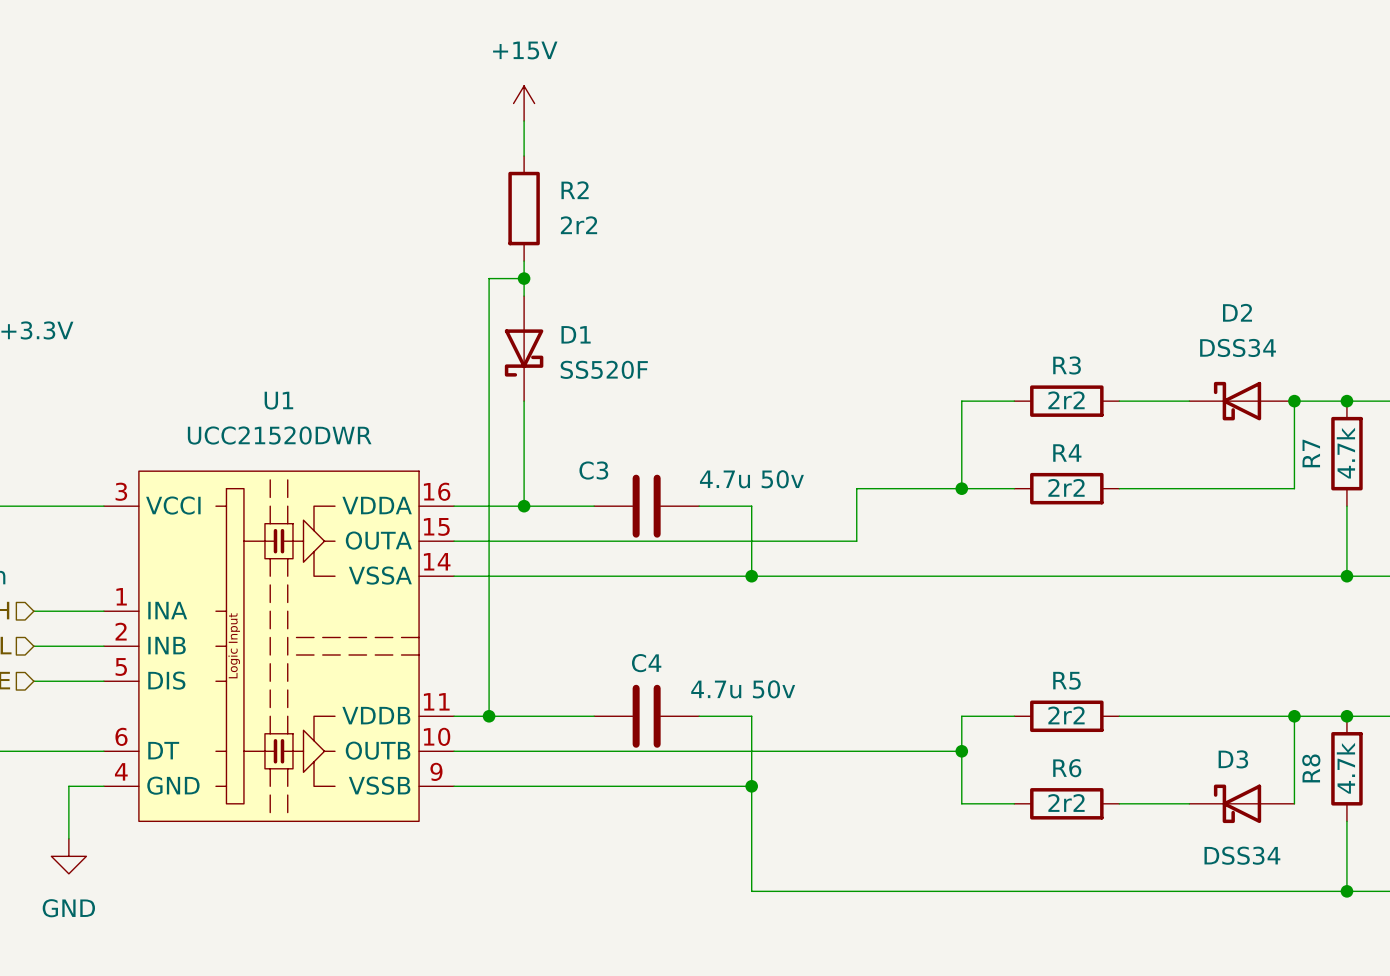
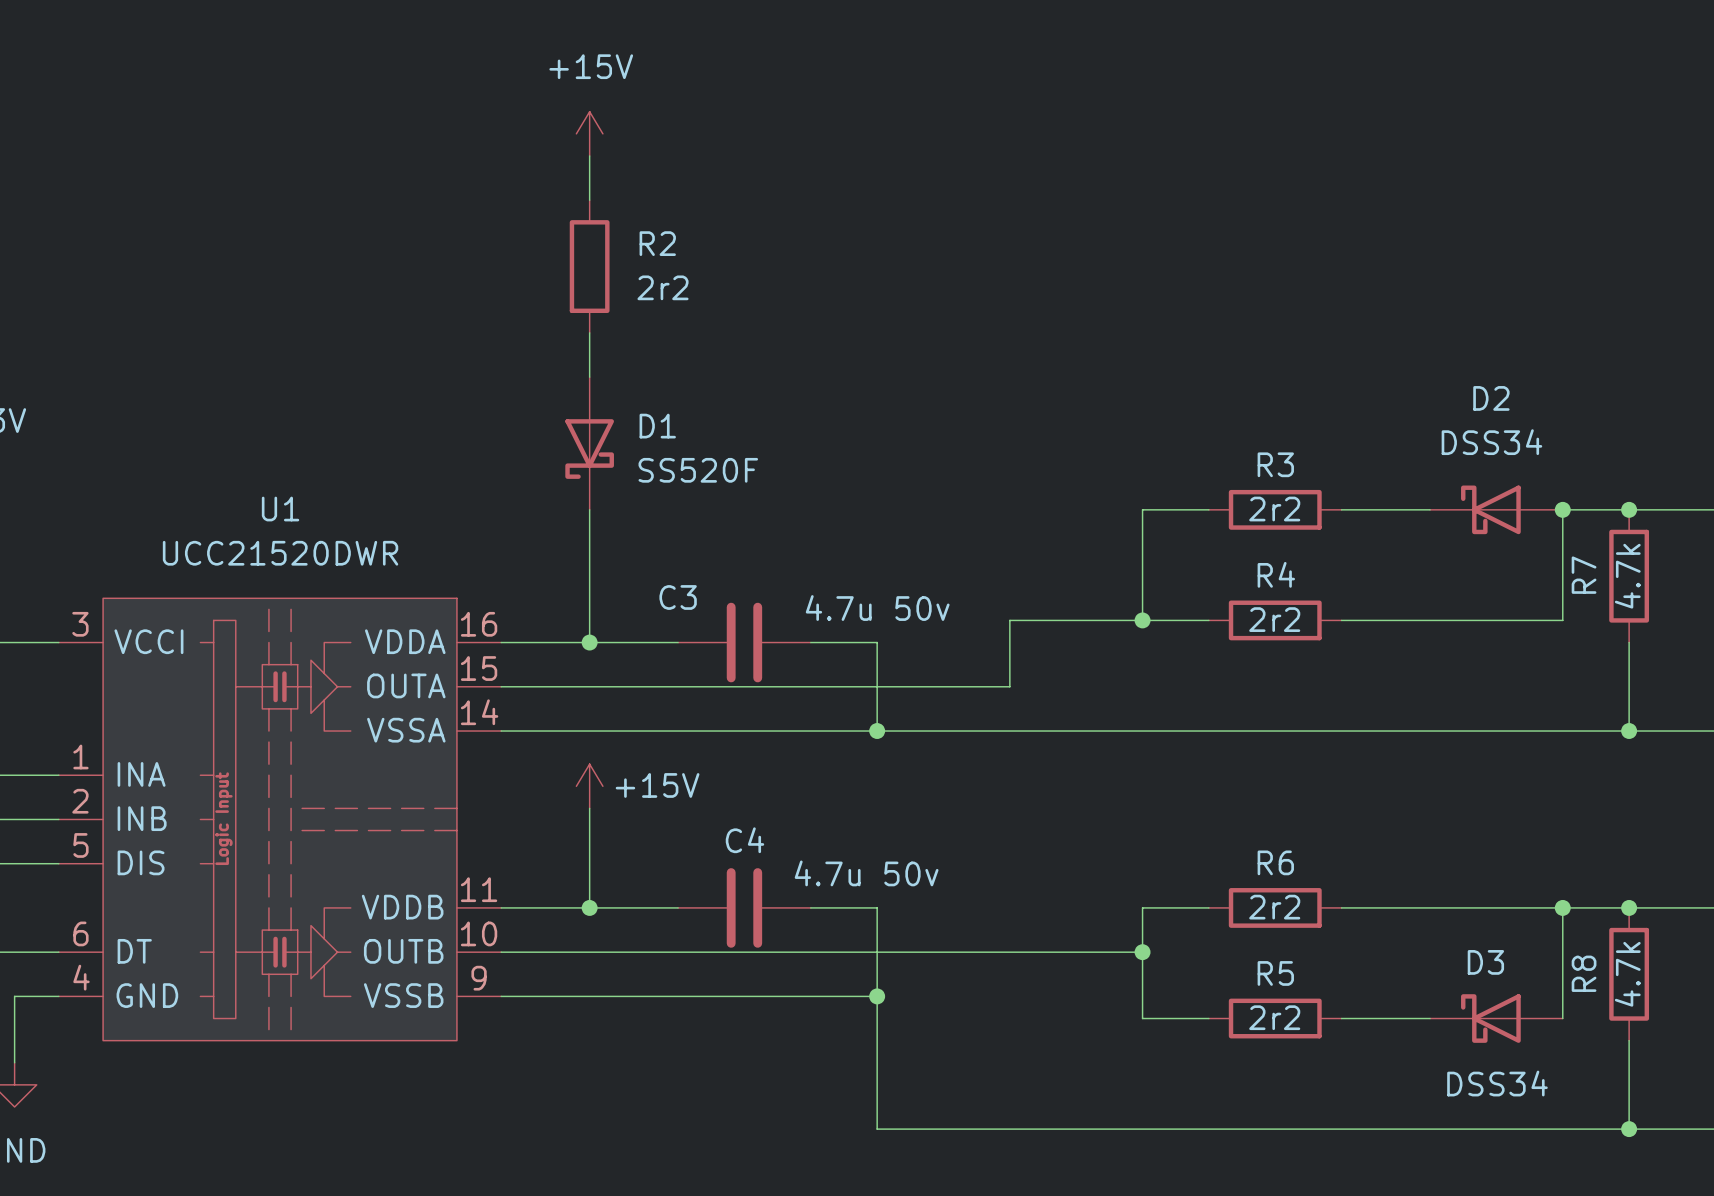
wire: (524, 278) (489, 278) (489, 716) -> none
junction: (524, 278) -> none
power symbol: none -> +15V (589, 786)
wire: none -> (589, 808) (589, 907)
R5 name: R5 (1066, 680) -> R6 (1275, 862)
junction position: (489, 716) -> (589, 907)
R6 name: R6 (1067, 768) -> R5 (1275, 973)

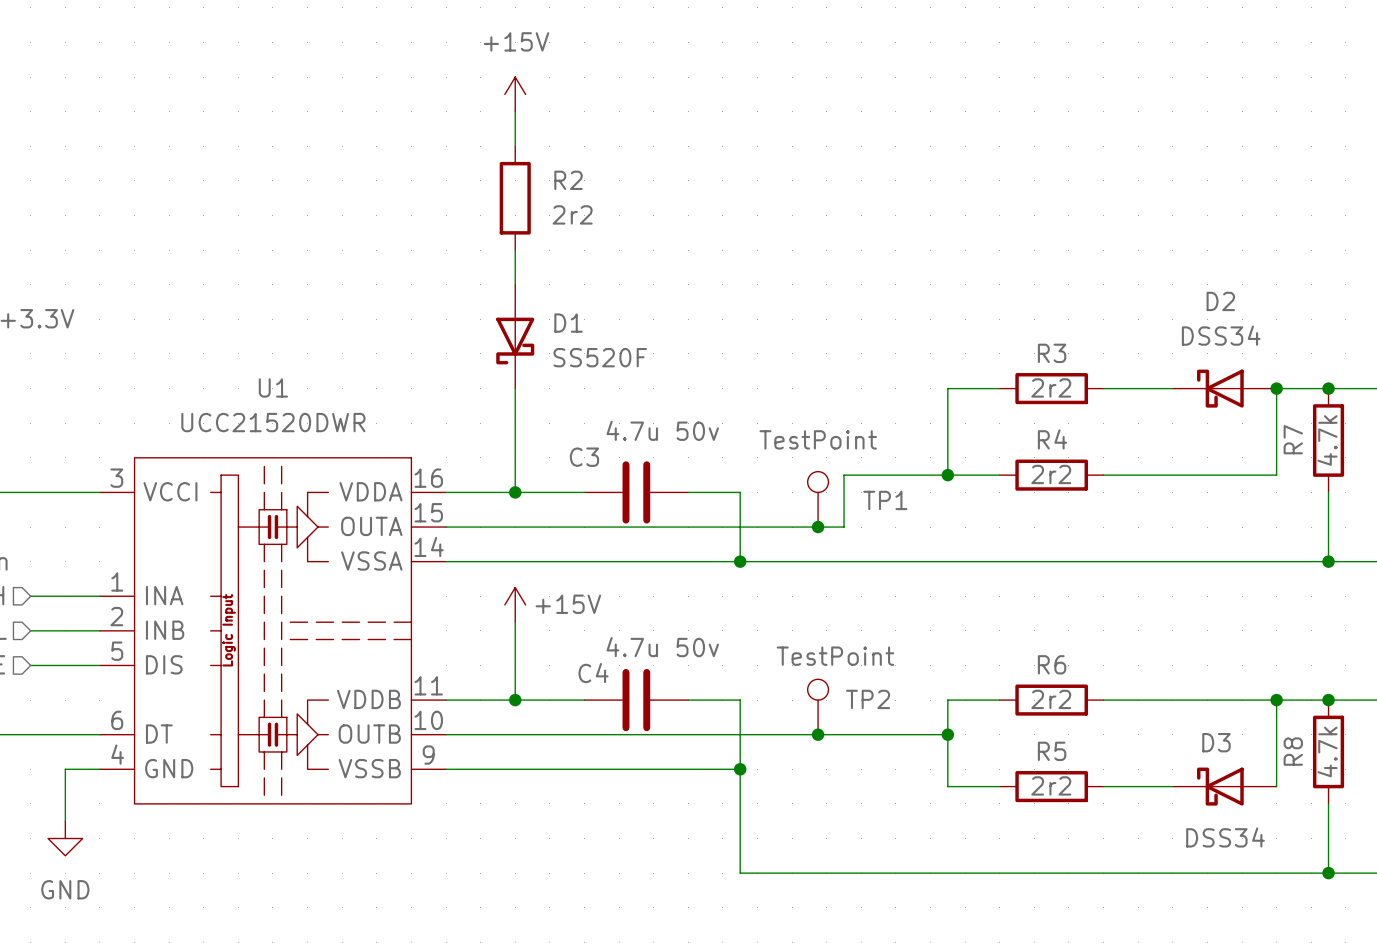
C3 value position: 4.7u 50v (877, 608) -> 4.7u 50v (662, 430)
TP1: none -> TestPoint (818, 499)
junction: none -> (818, 527)
C4 name position: C4 (744, 840) -> C4 (593, 673)
C4 value position: 4.7u 50v (866, 873) -> 4.7u 50v (662, 647)
TP2: none -> TestPoint (818, 706)
junction: none -> (818, 734)

